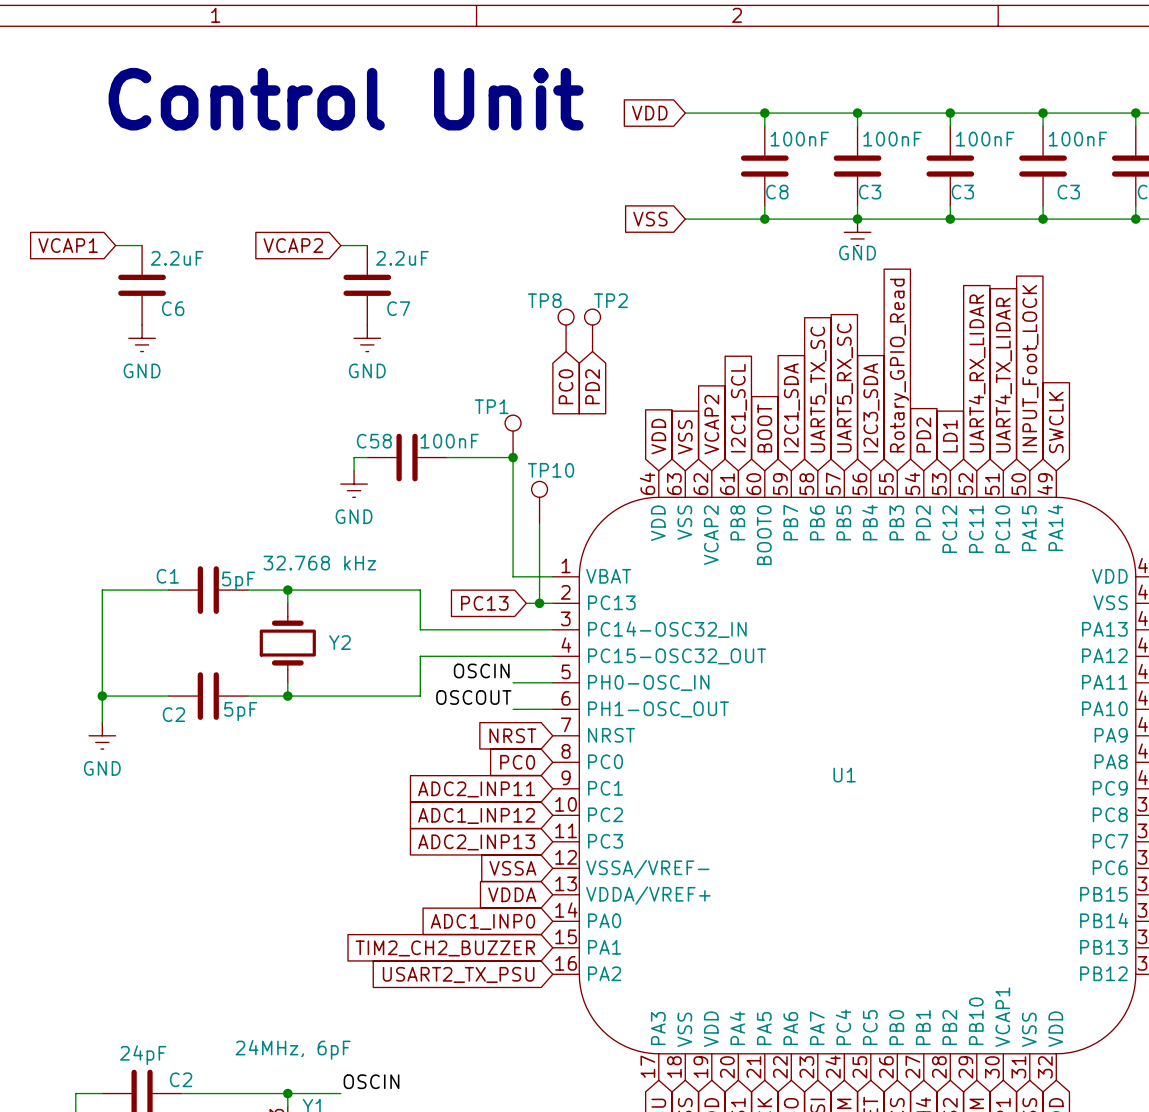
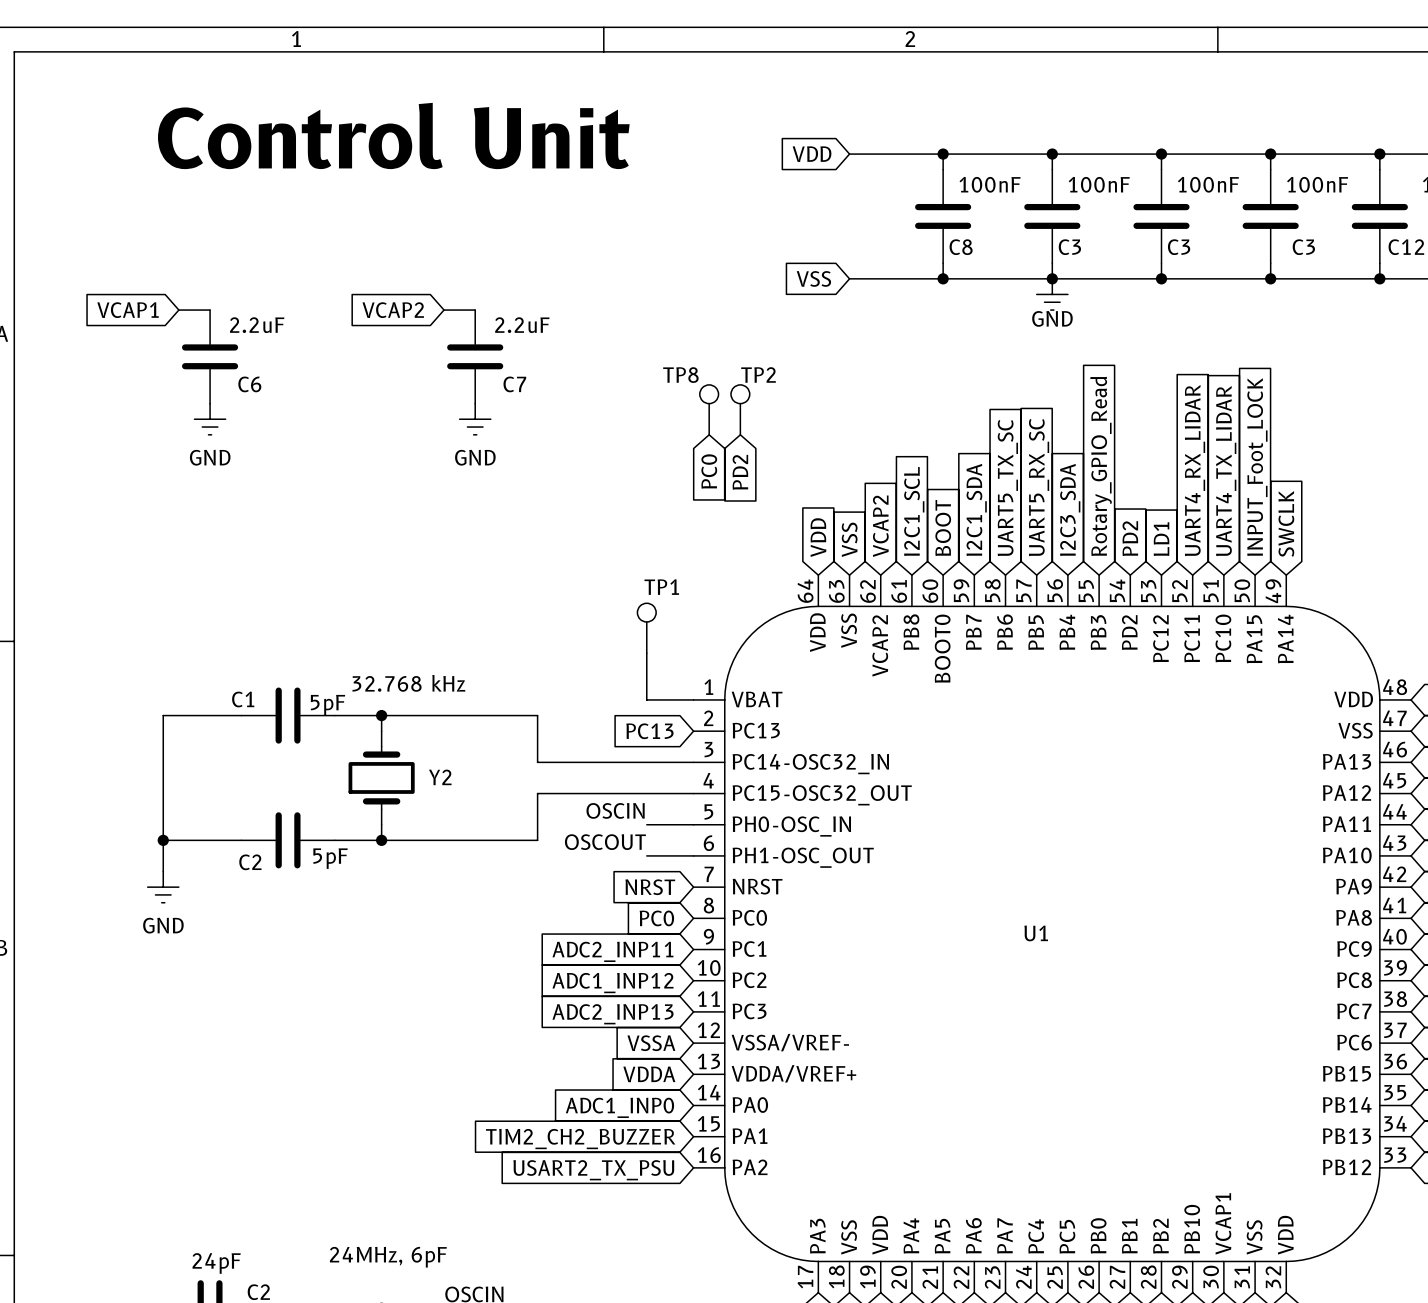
TP1 name position: TP1 (491, 406) -> TP1 (661, 587)
TP1 position: (513, 436) -> (646, 628)
wire: (367, 457) (354, 457) (354, 470) -> none
C58: 100nF (407, 457) -> none
wire: (446, 457) (513, 457) (513, 537) -> none
junction: (513, 457) -> none
power symbol: GND (354, 484) -> none
TP10: (539, 502) -> none
wire: (539, 523) (539, 603) -> none
global label position: PC13 (484, 603) -> PC13 (649, 731)
wire: (526, 603) (552, 603) -> none
junction: (539, 603) -> none

